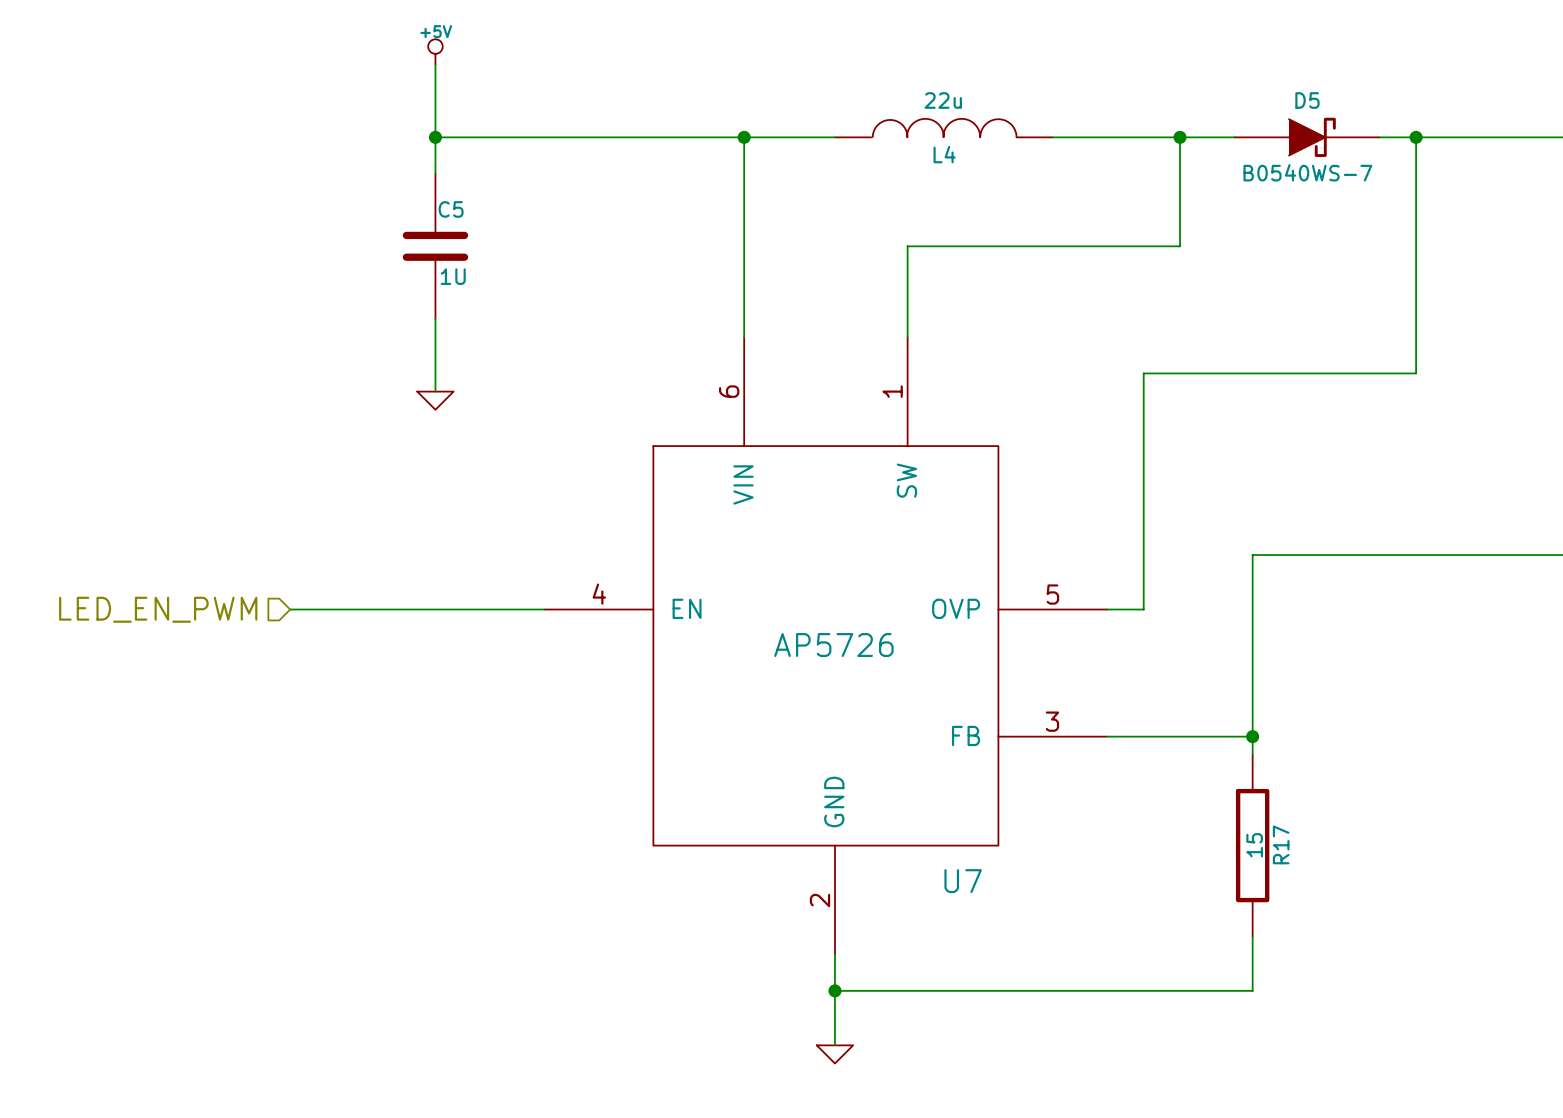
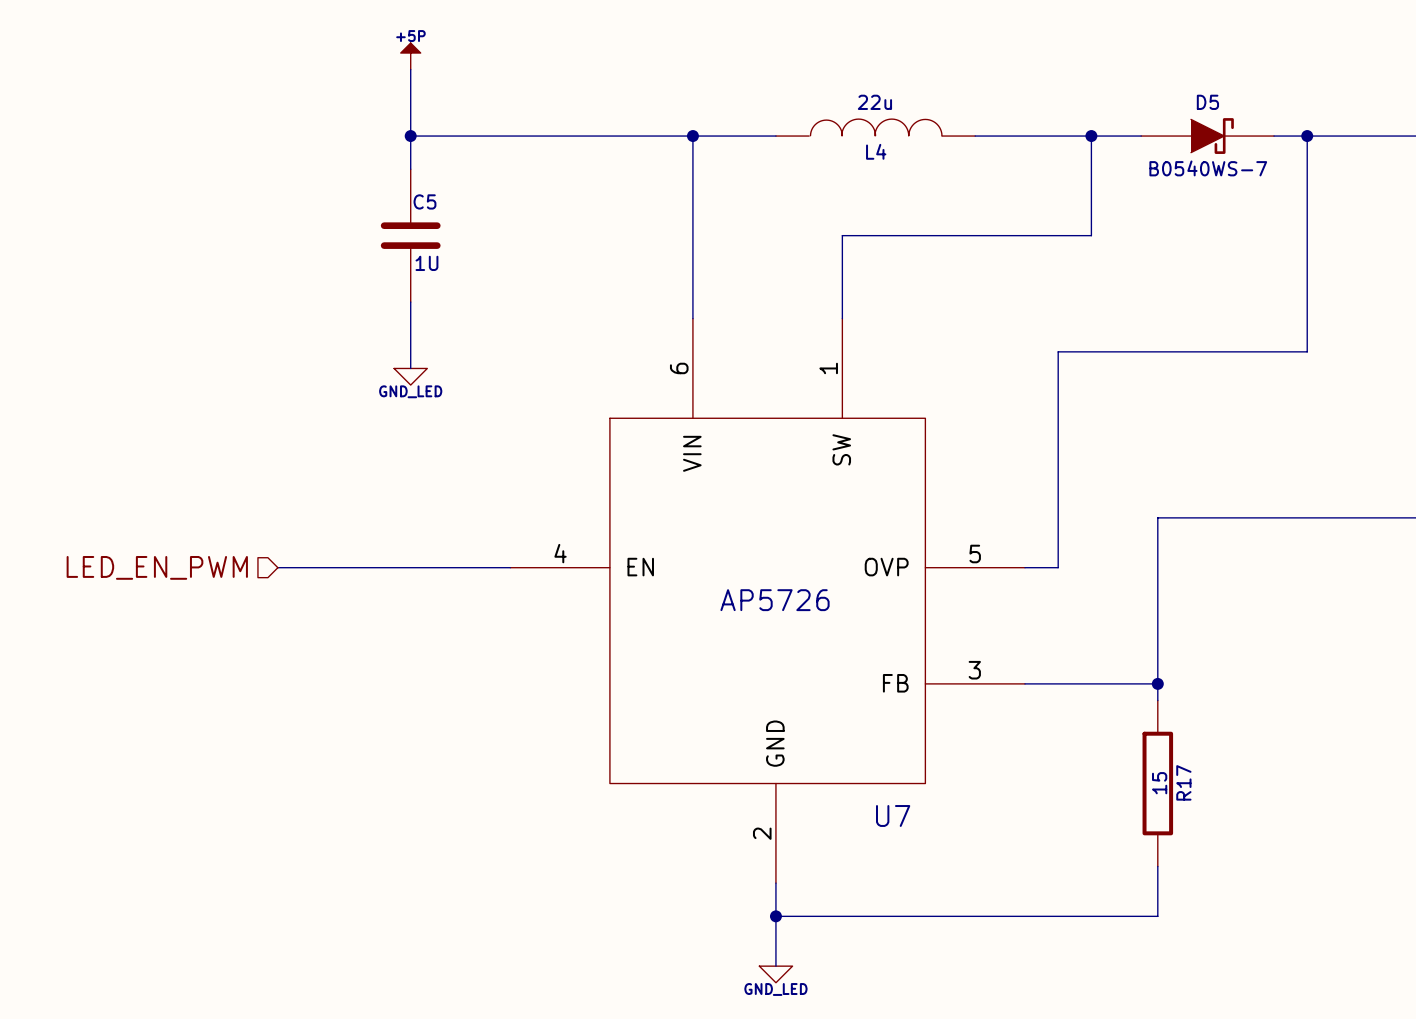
power symbol: +5V (435, 52) -> +5P (410, 56)
power symbol text: none -> GND_LED (410, 391)
power symbol text: none -> GND_LED (775, 989)

